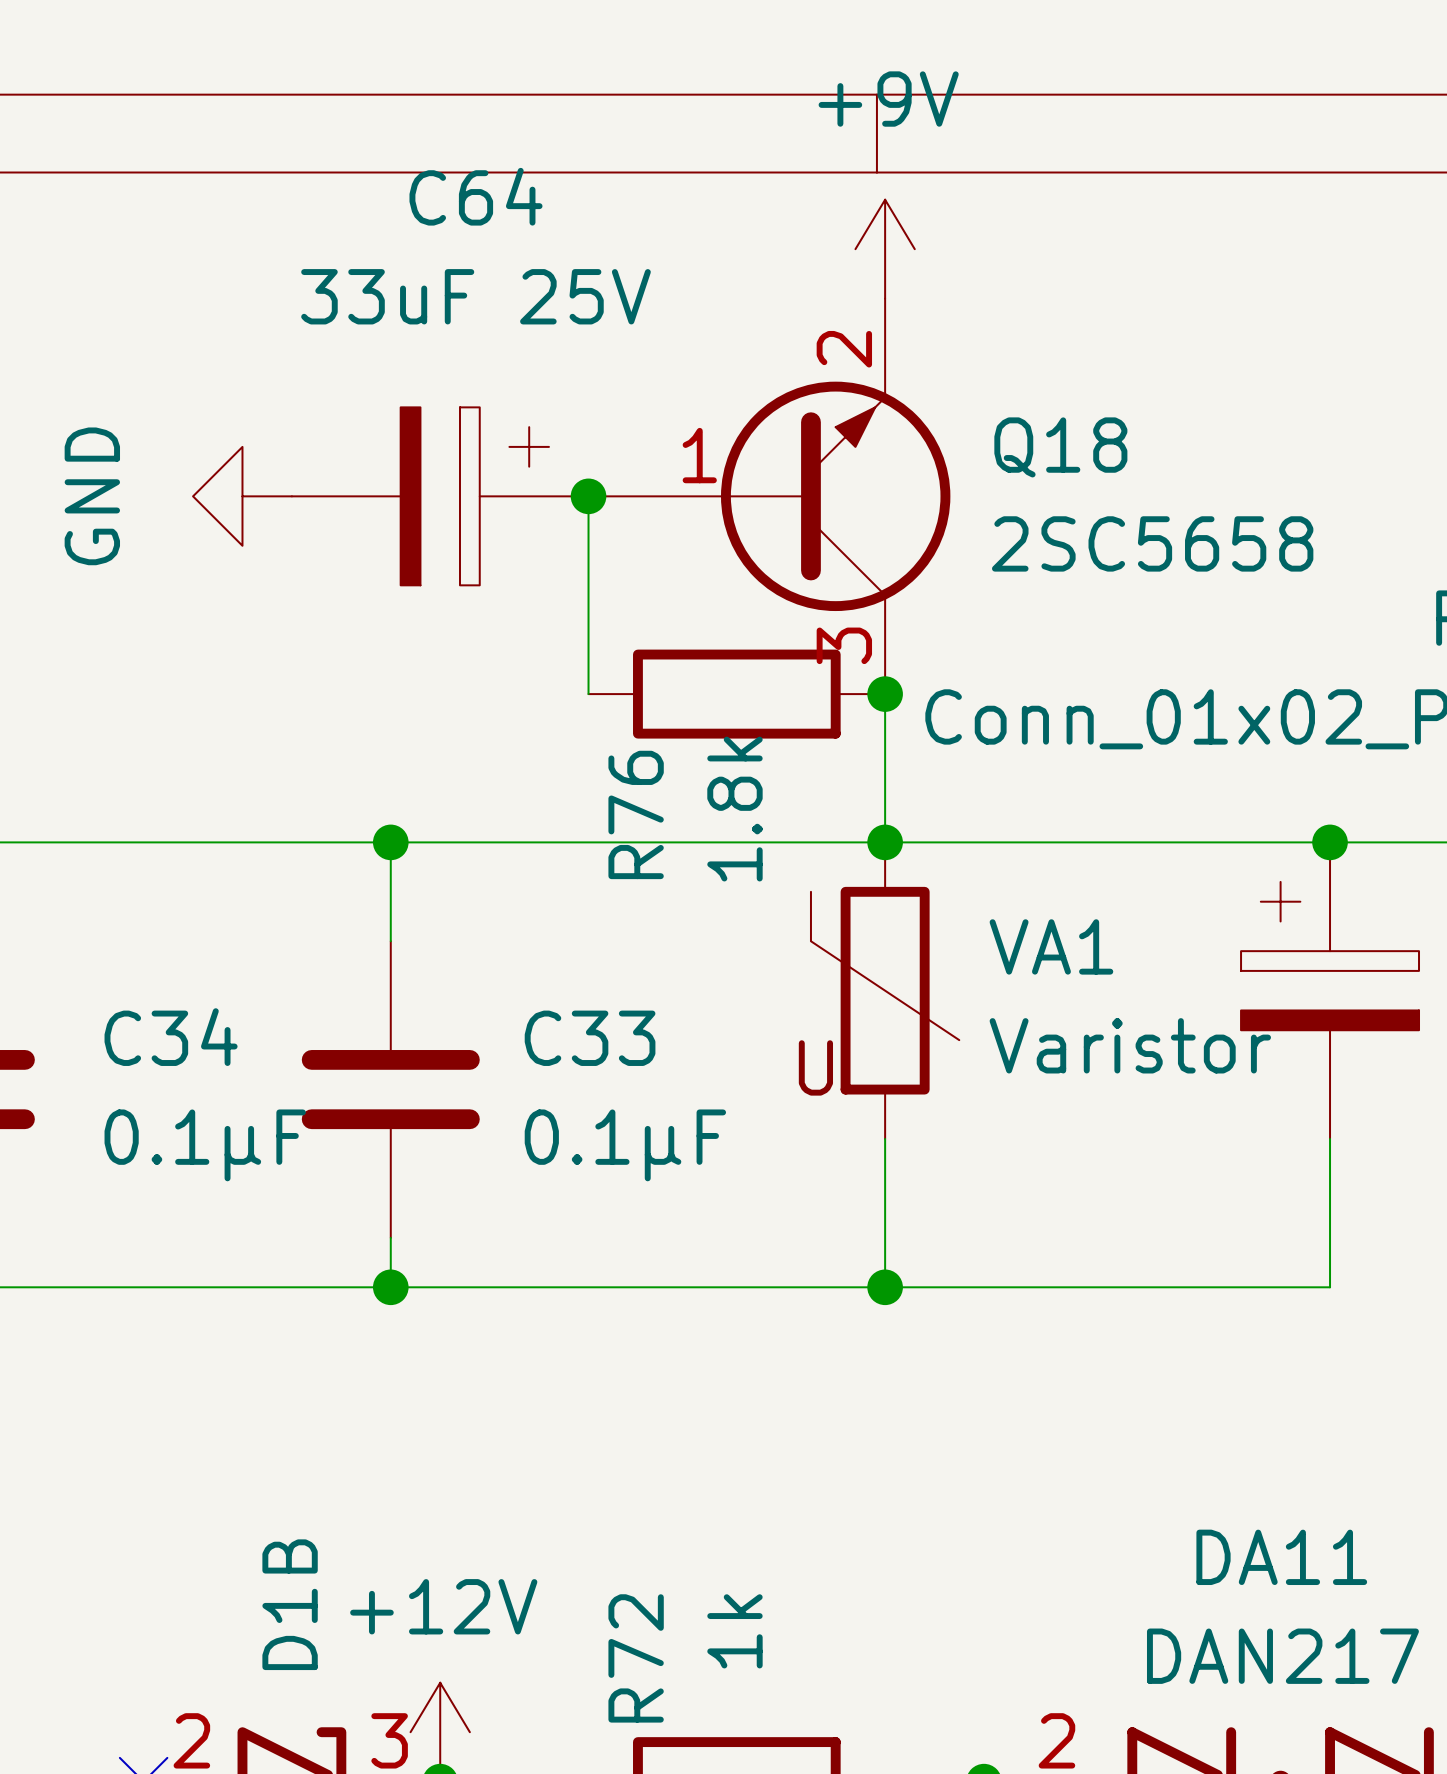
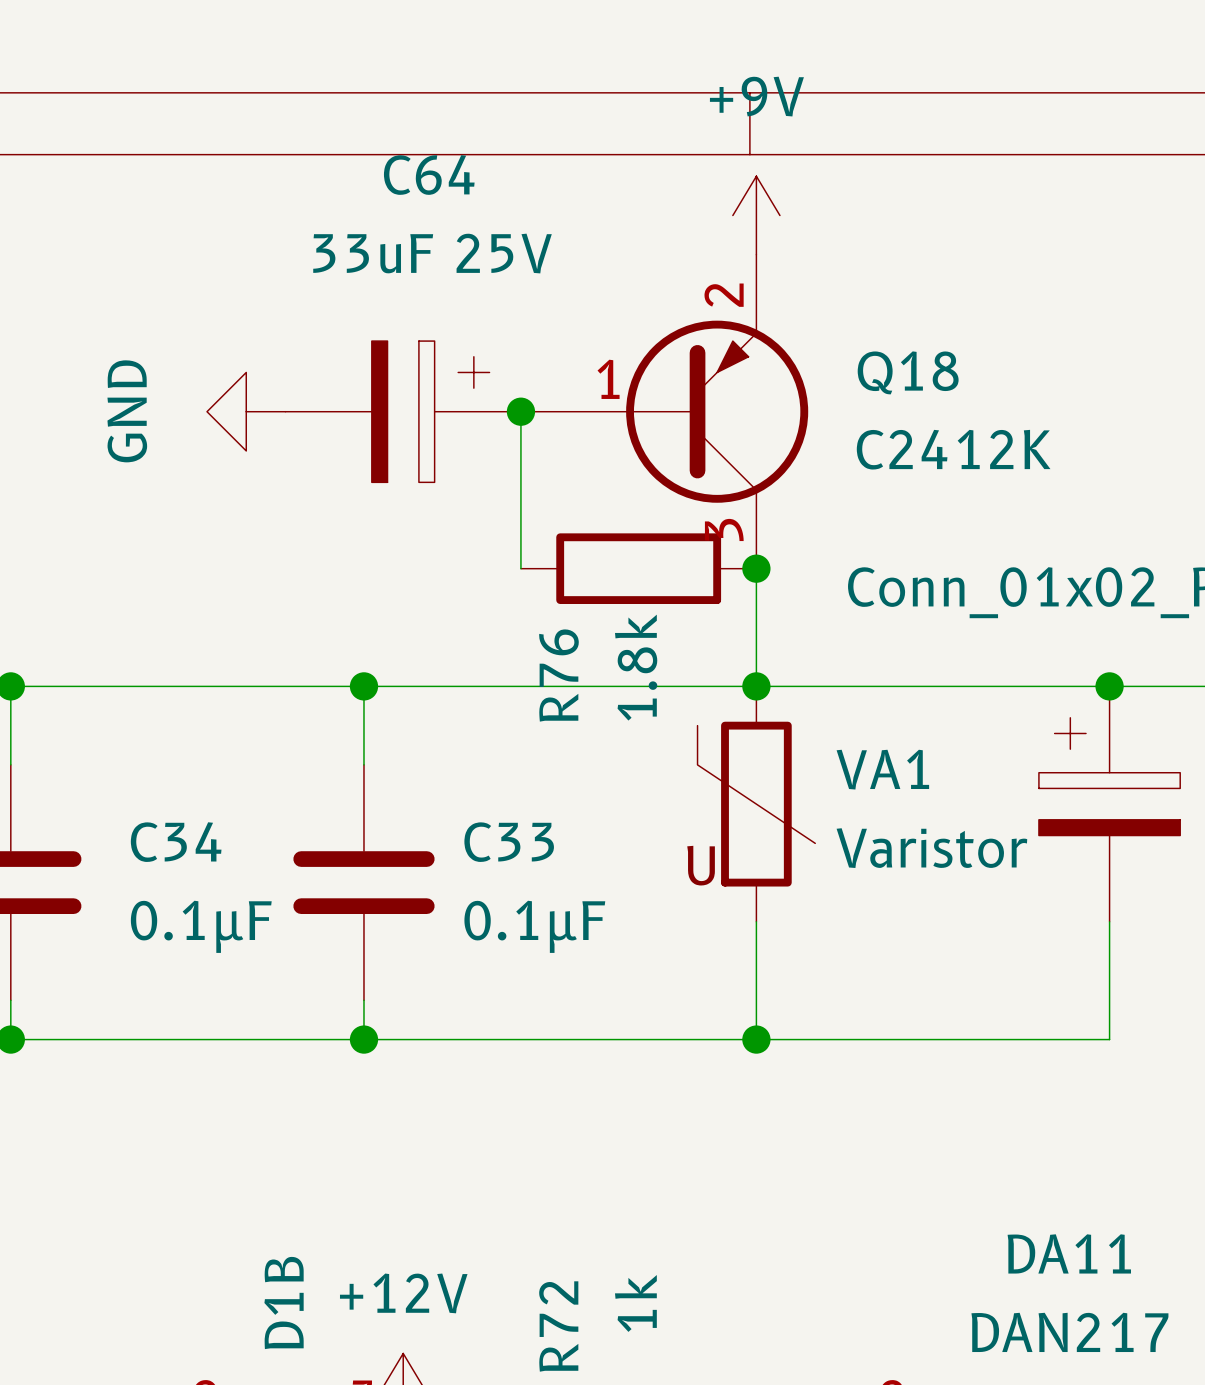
Q18 symbol: [588, 298, 951, 695] -> [520, 254, 809, 569]
Q18 name position: Q18 (1060, 447) -> Q18 (908, 372)
Q18 value: 2SC5658 (1152, 543) -> C2412K (953, 449)

